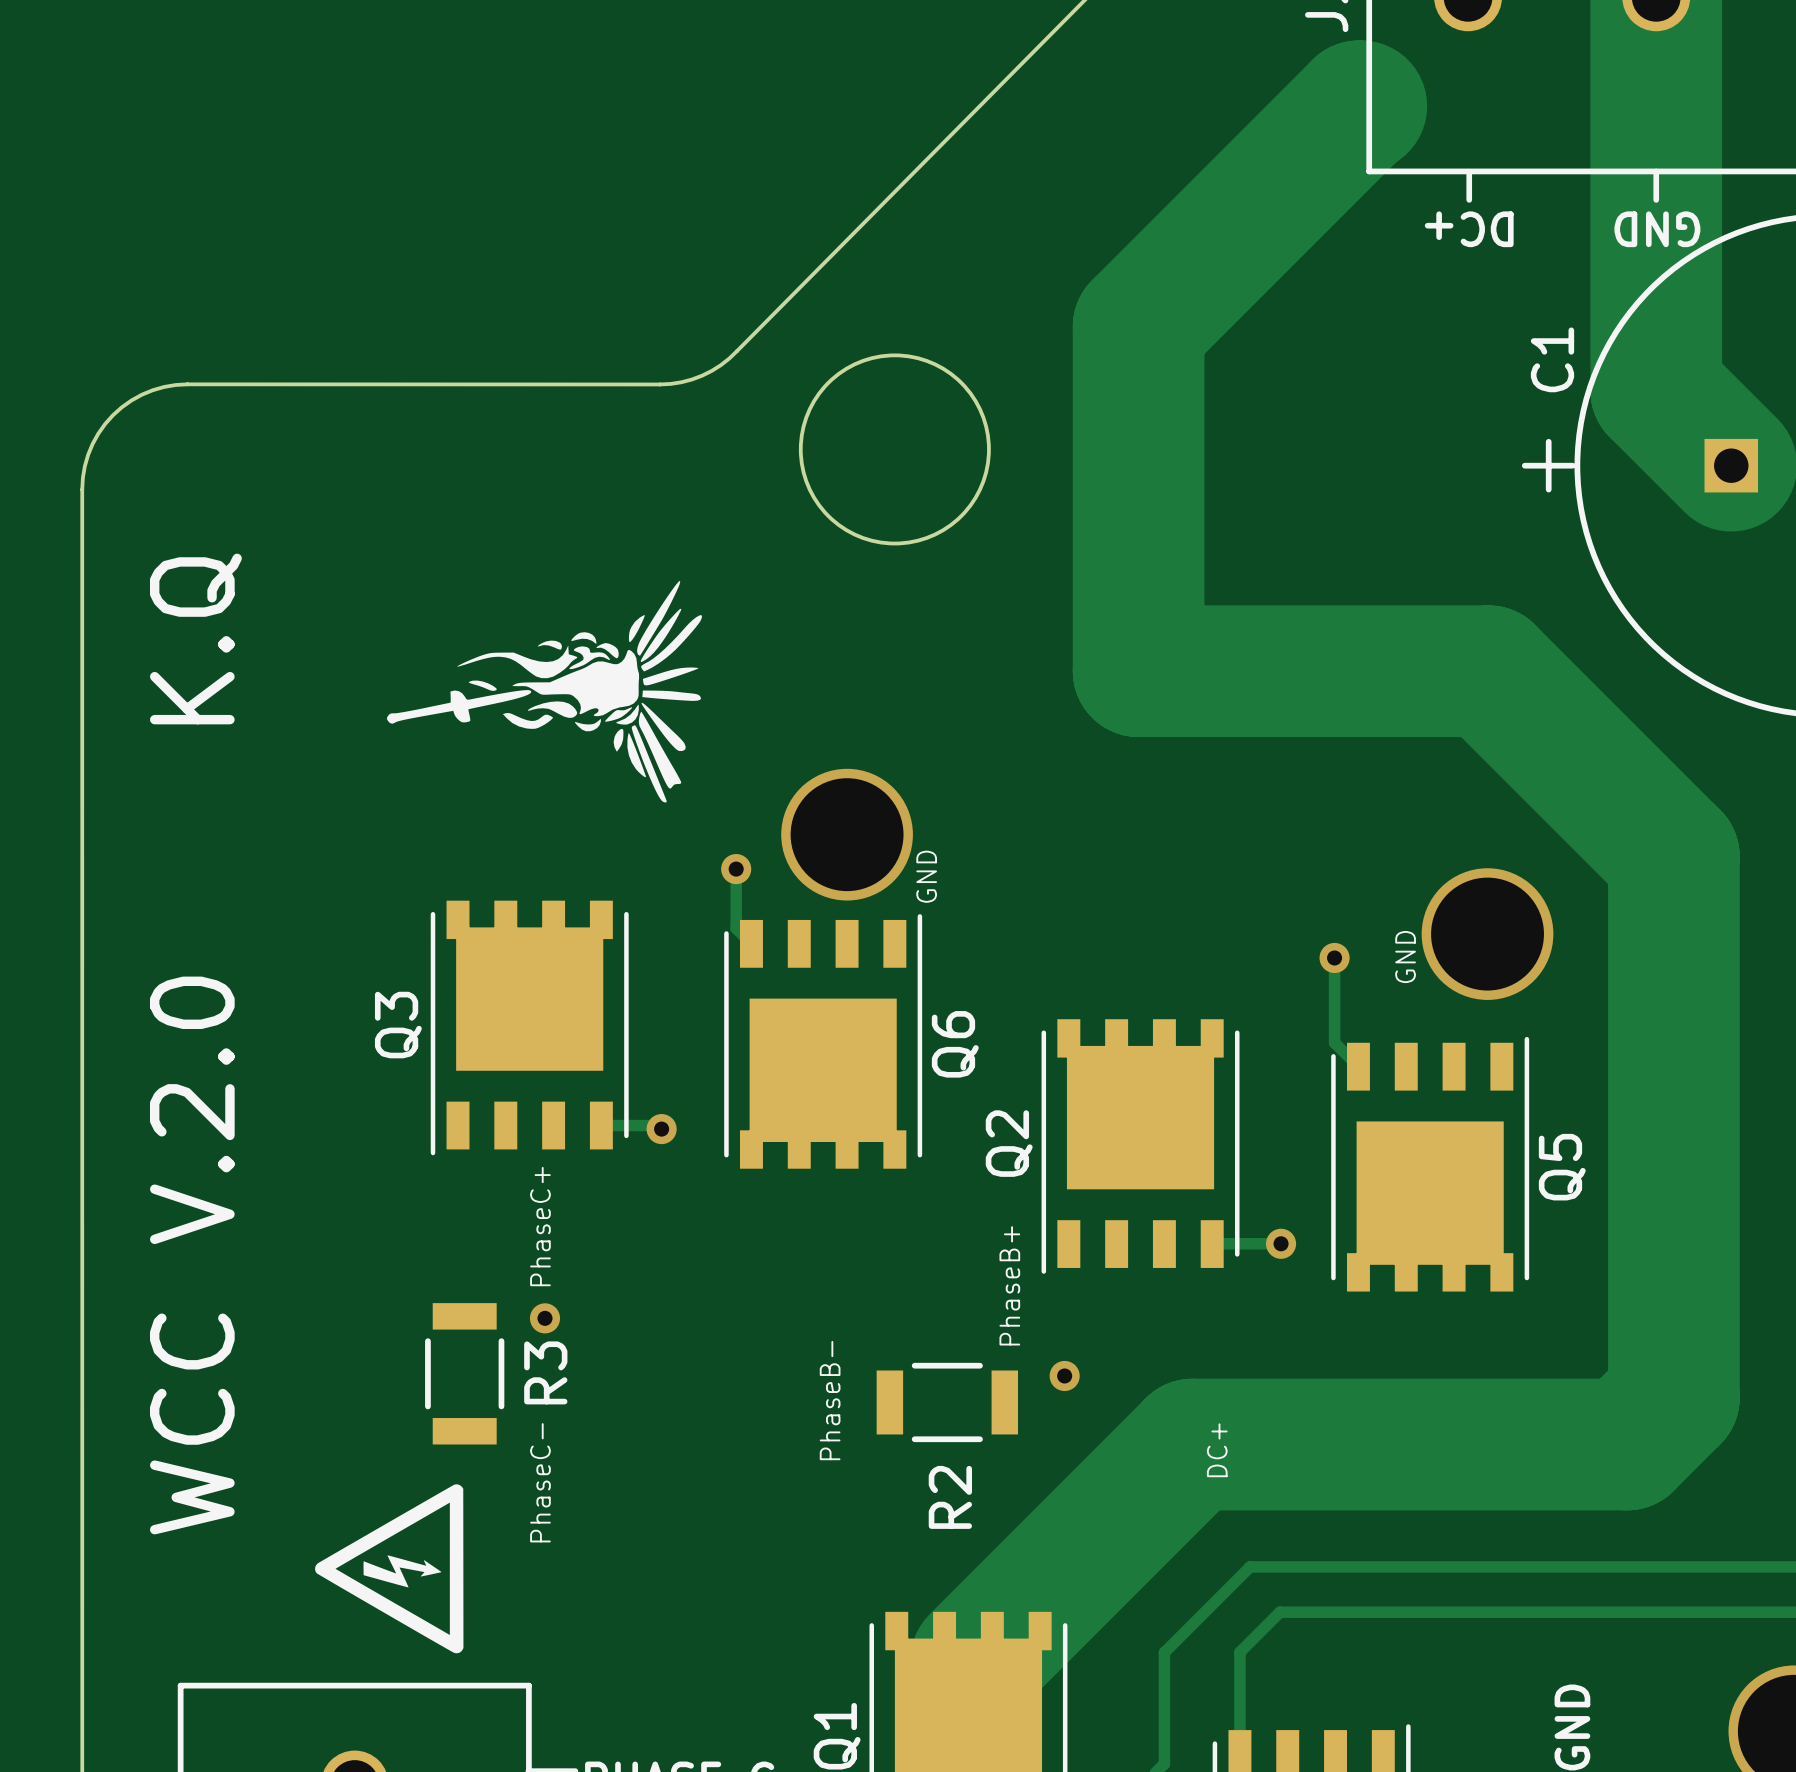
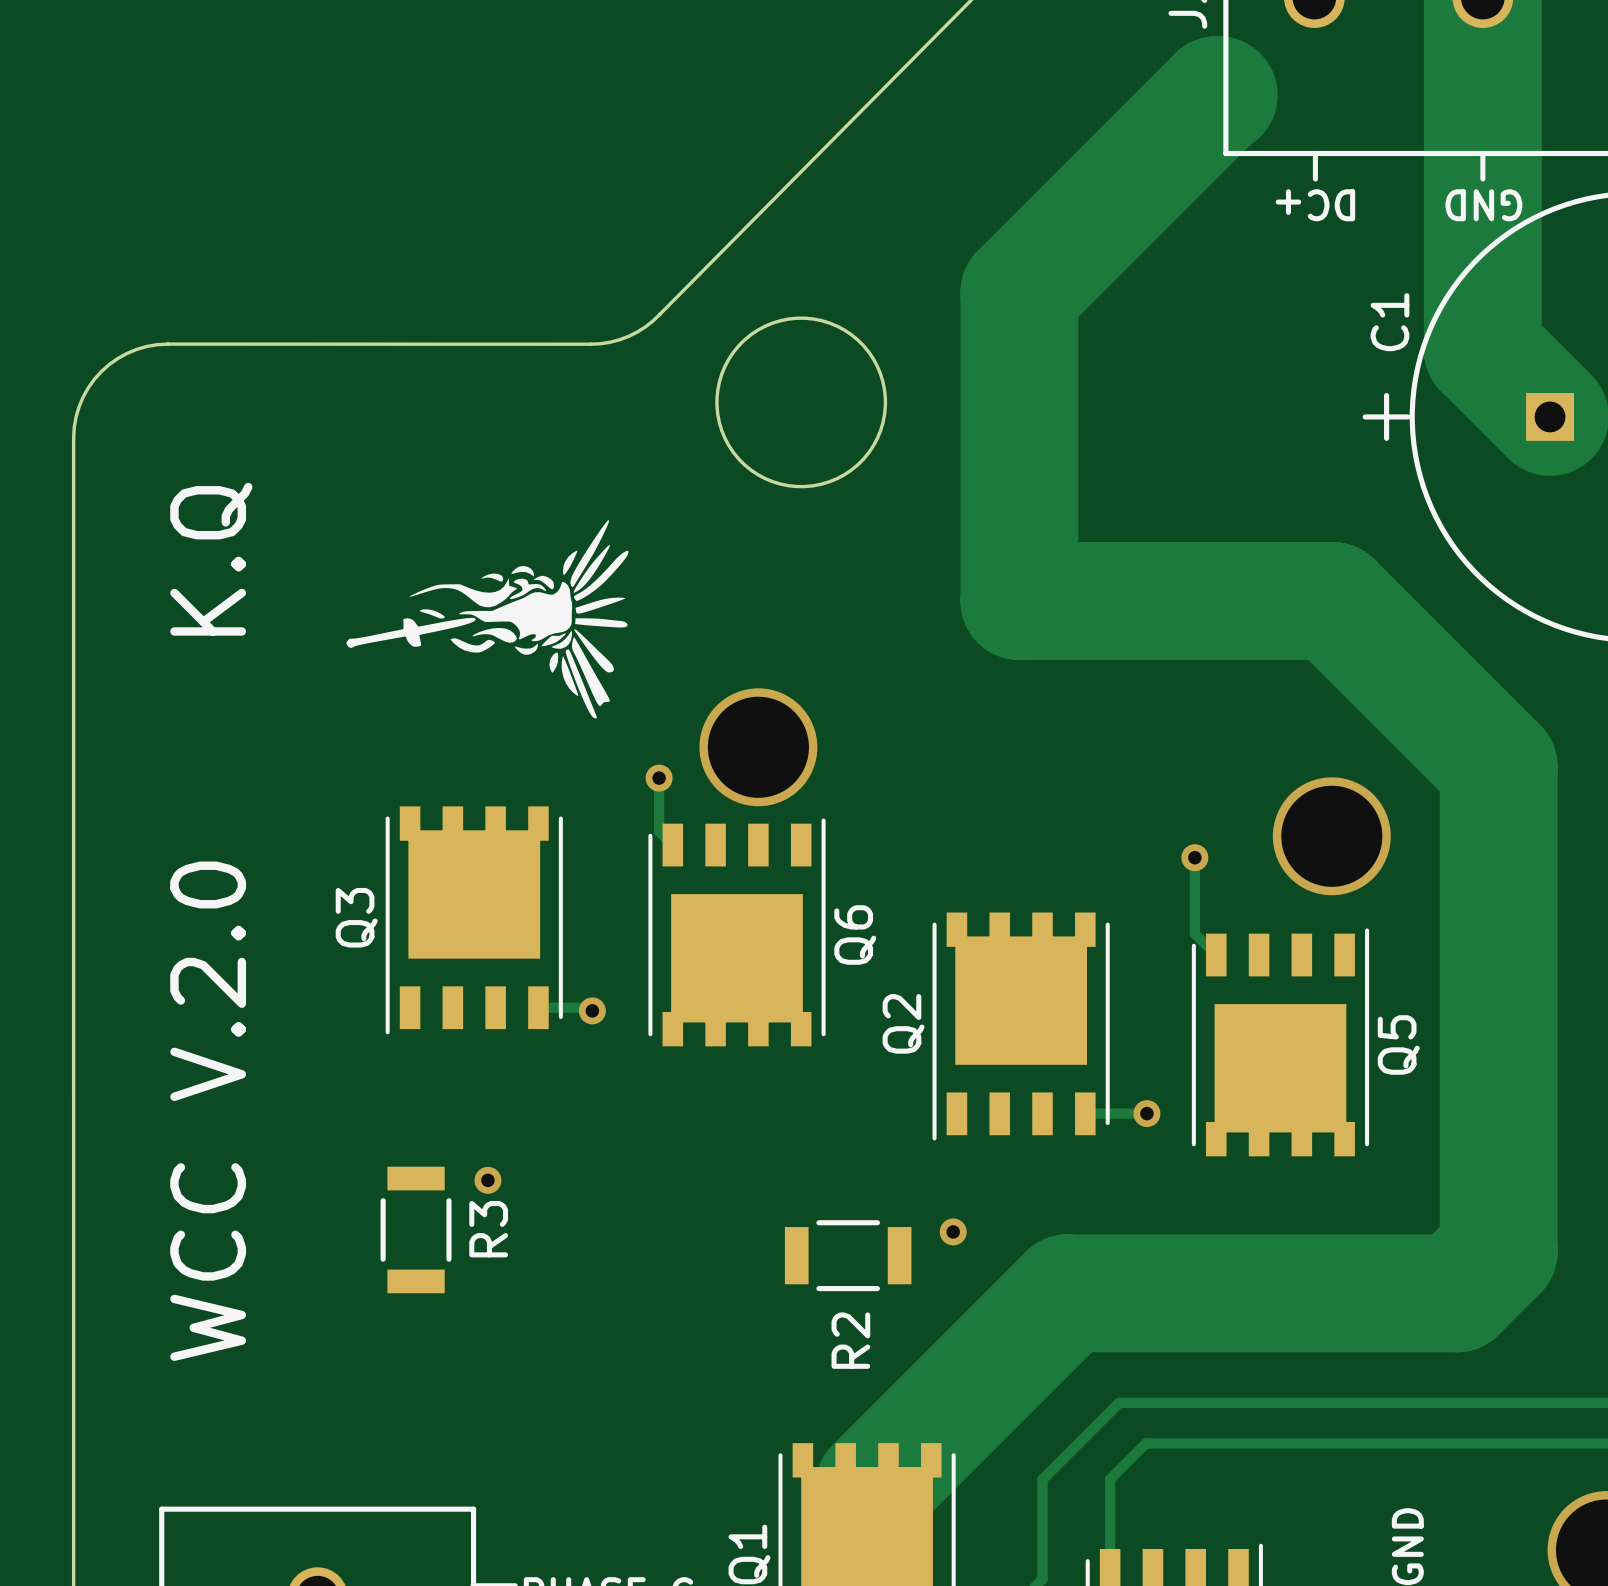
text: GND (926, 876) -> none
text: GND (1405, 957) -> none
text position: WCC V.2.0 K.Q (195, 1044) -> WCC V.2.0 K.Q (211, 921)
text: PhaseC+ (540, 1226) -> none
text: PhaseB+ (1009, 1285) -> none
text: PhaseB- (830, 1400) -> none
text: DC+ (1217, 1450) -> none
text: PhaseC- (540, 1482) -> none
drawing: [315, 1484, 464, 1654] -> none

